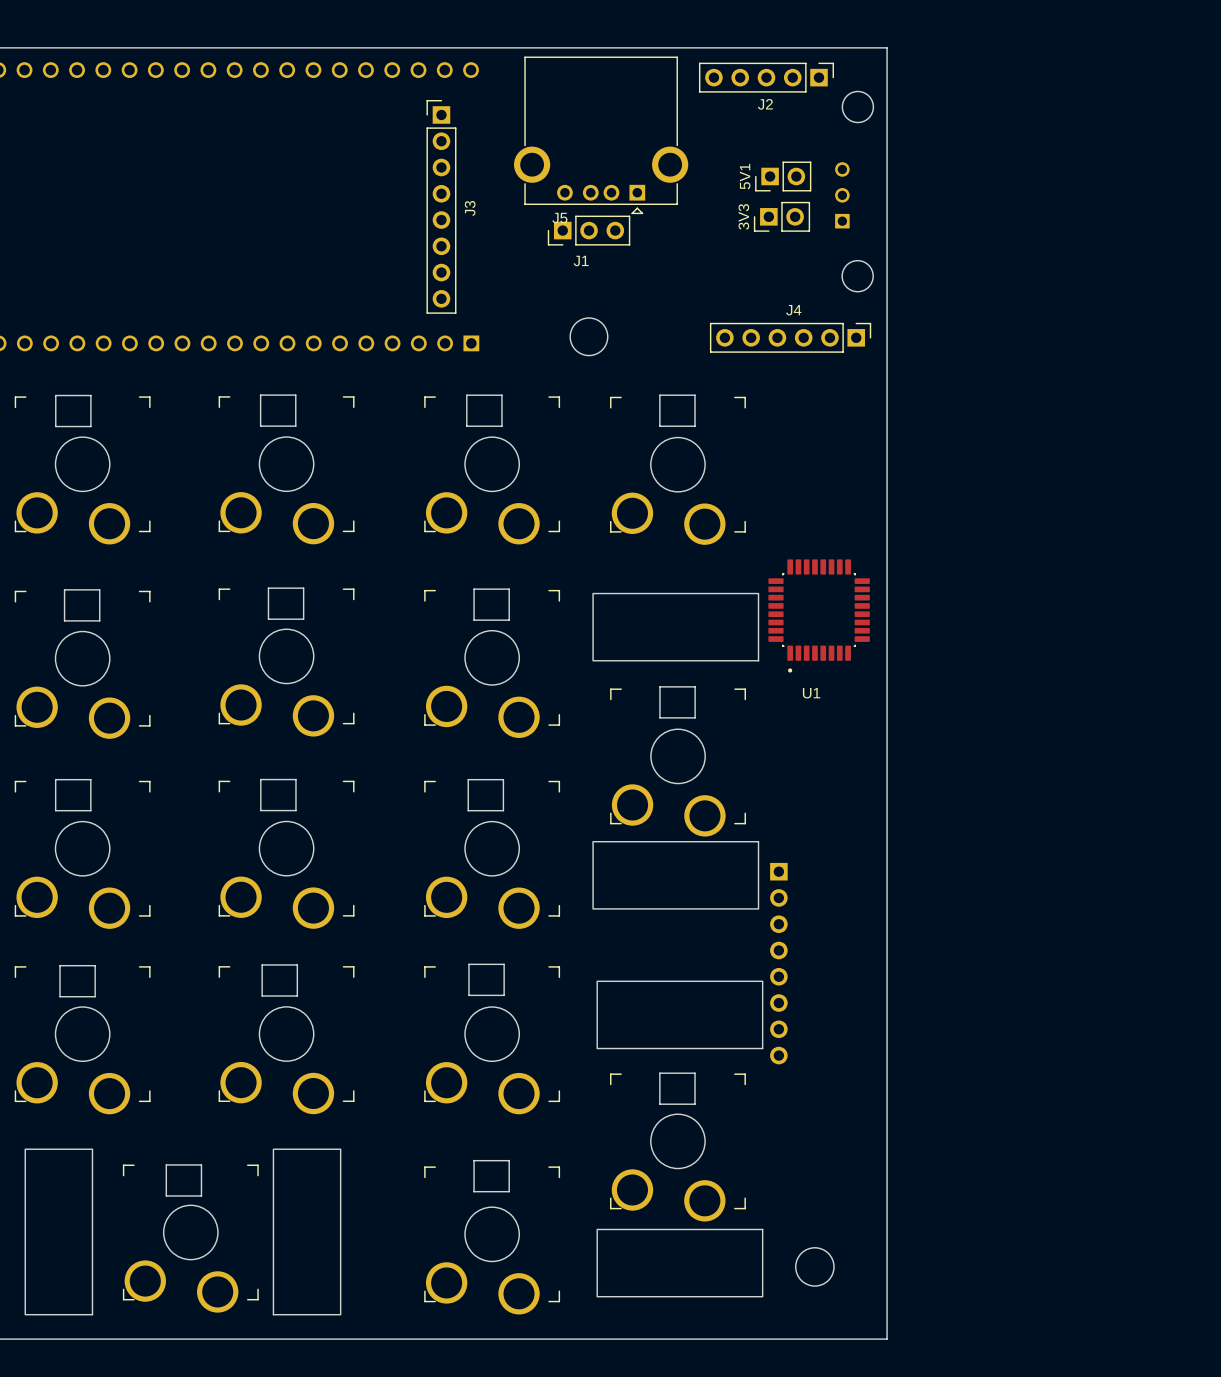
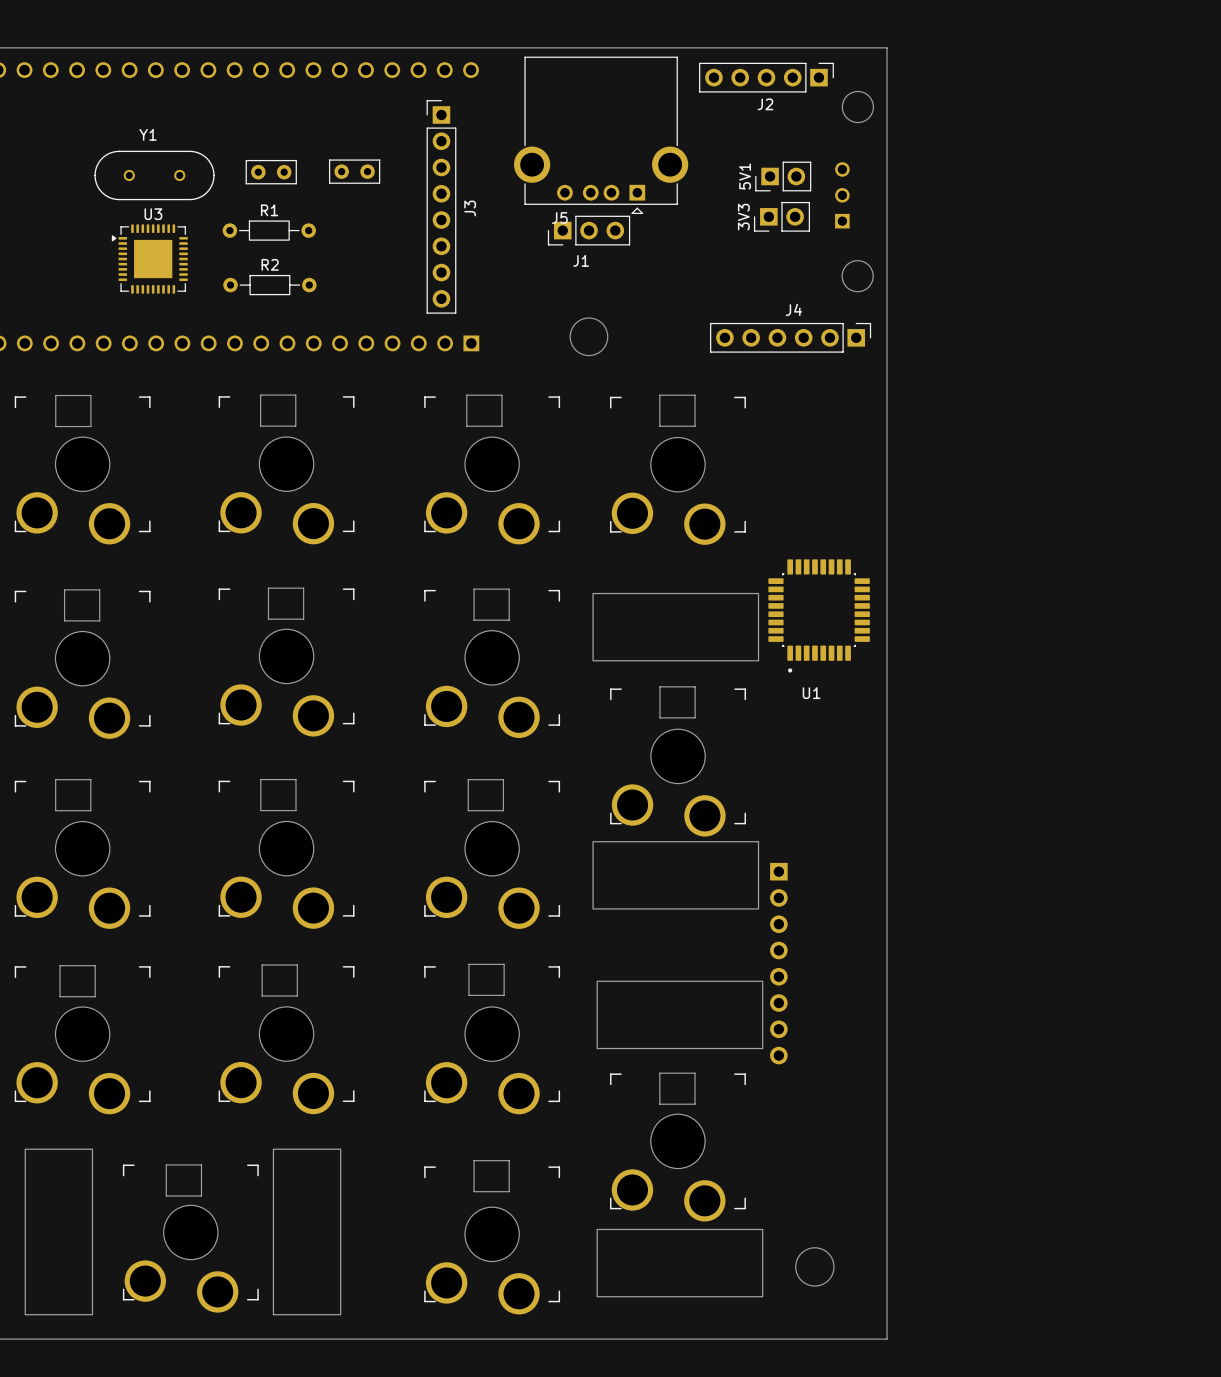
part: none -> (354, 171)
part: none -> (271, 172)
Y1: none -> (154, 175)
R1: none -> (269, 230)
U3: none -> (149, 259)
R2: none -> (269, 285)

